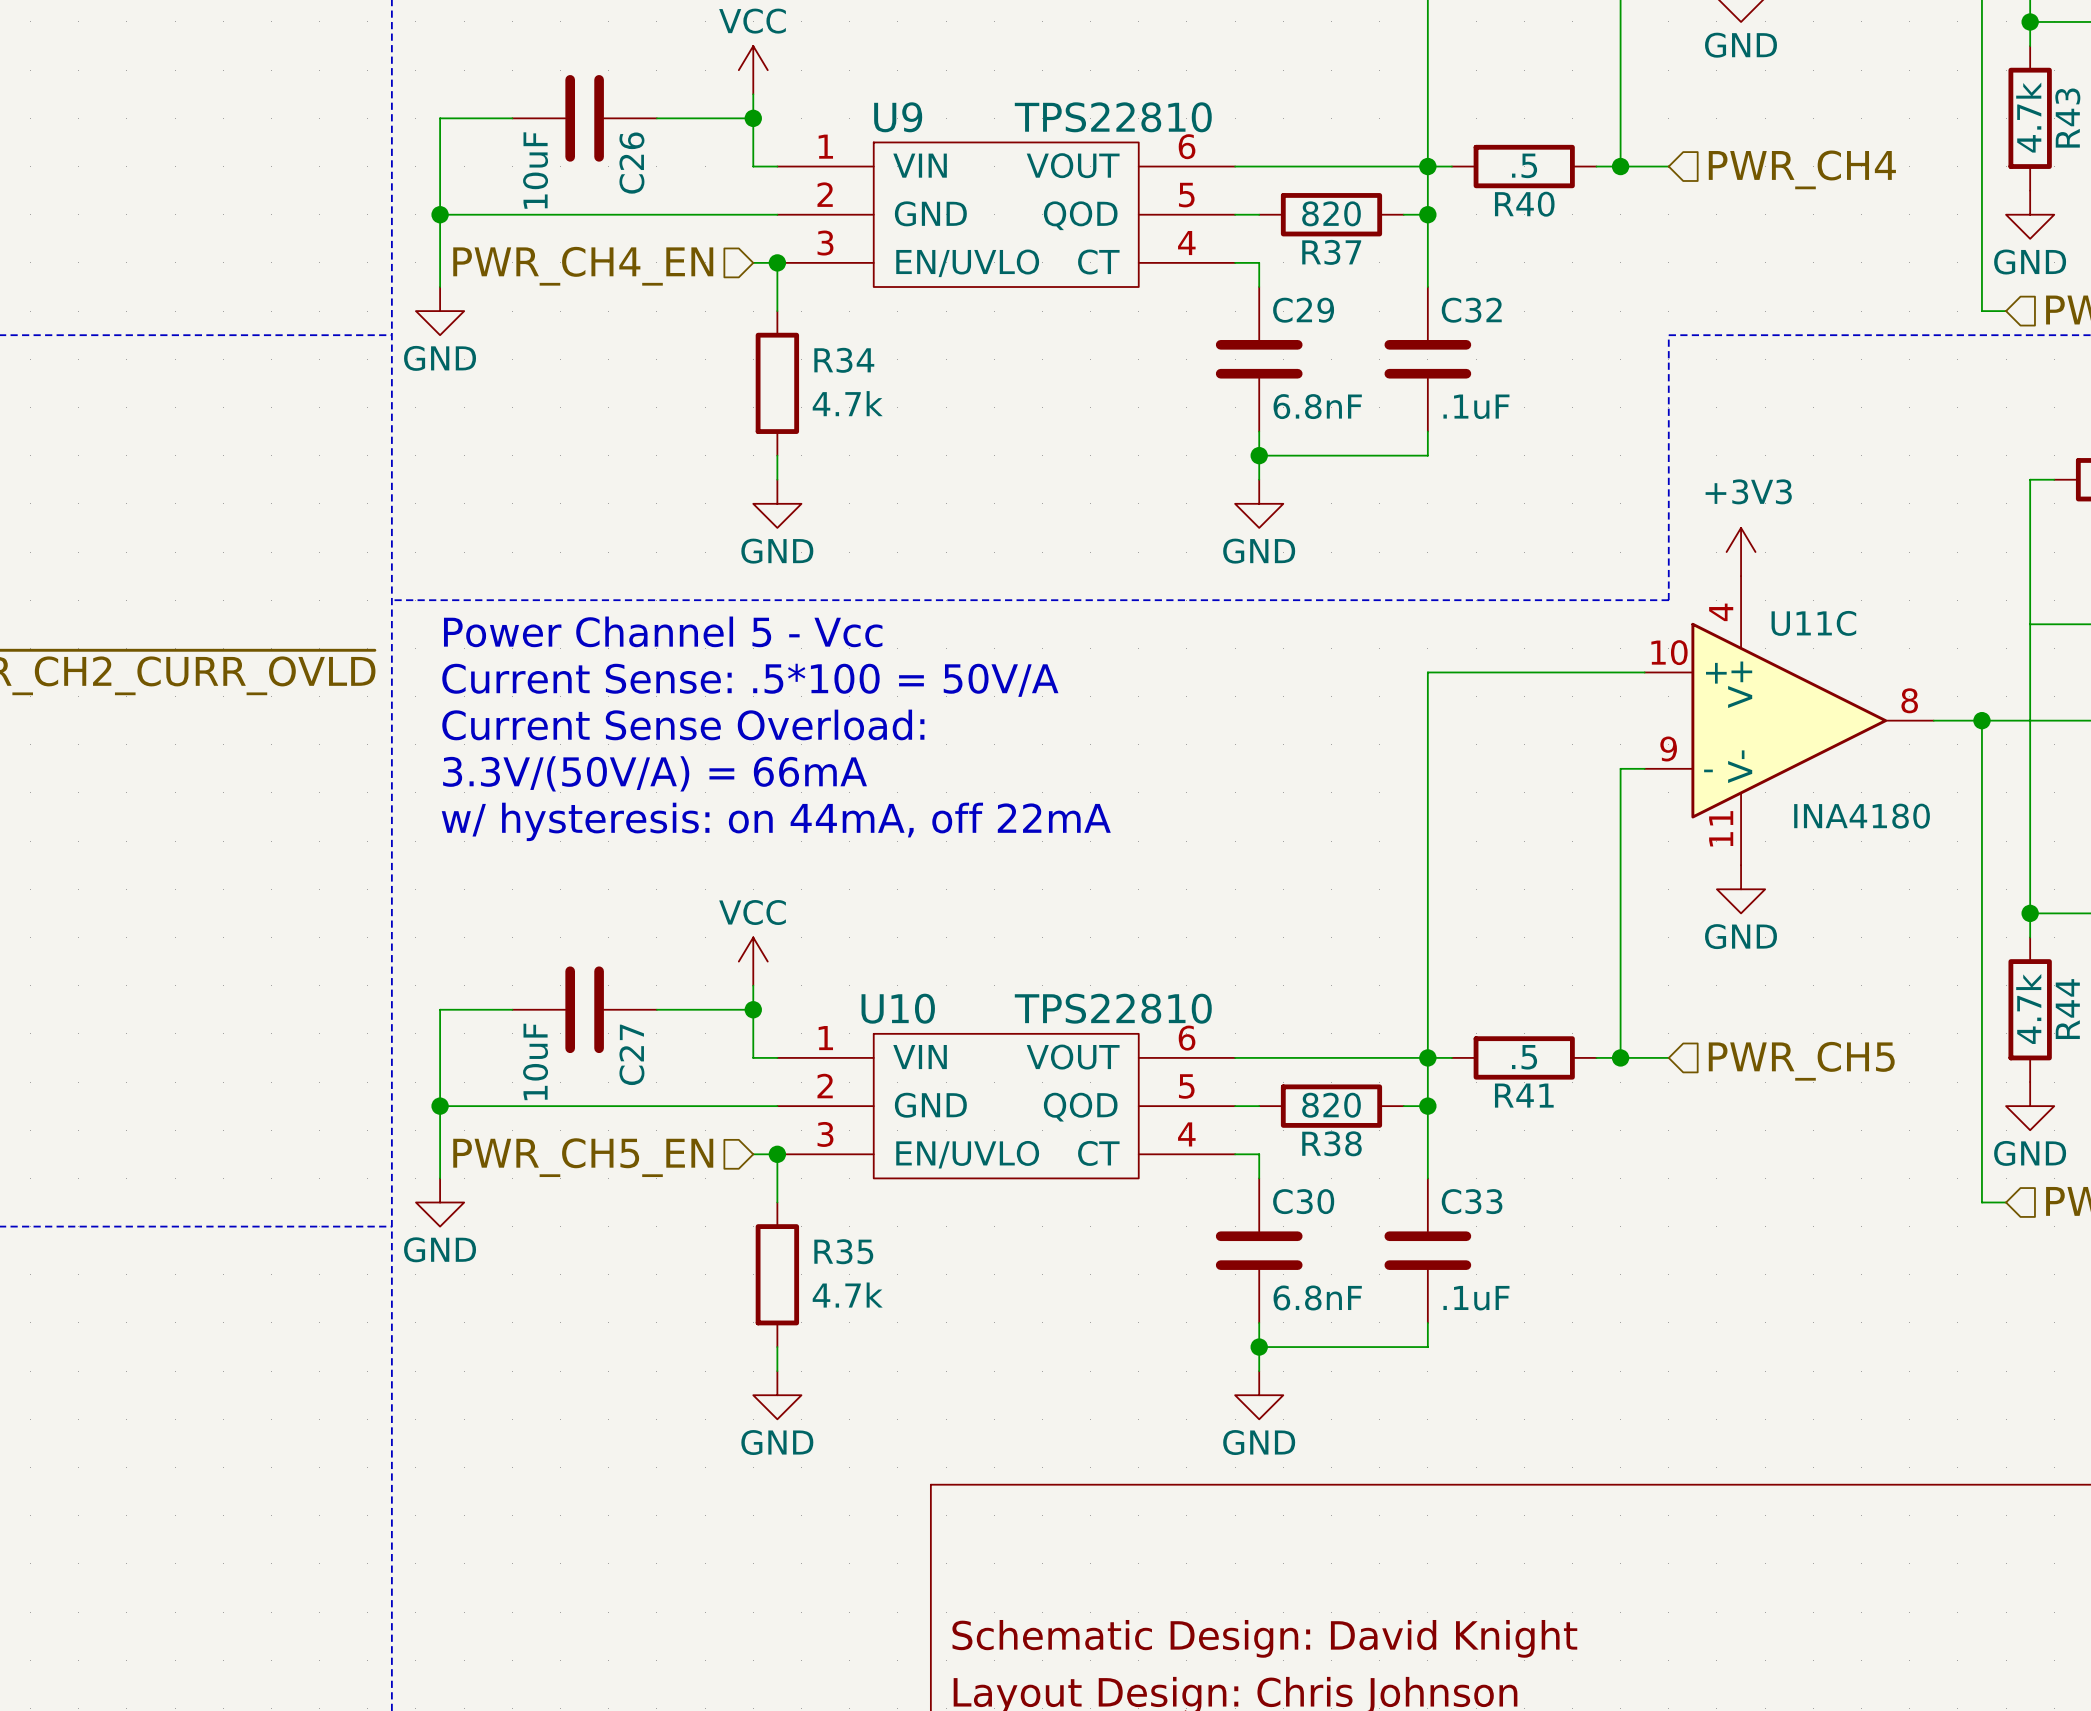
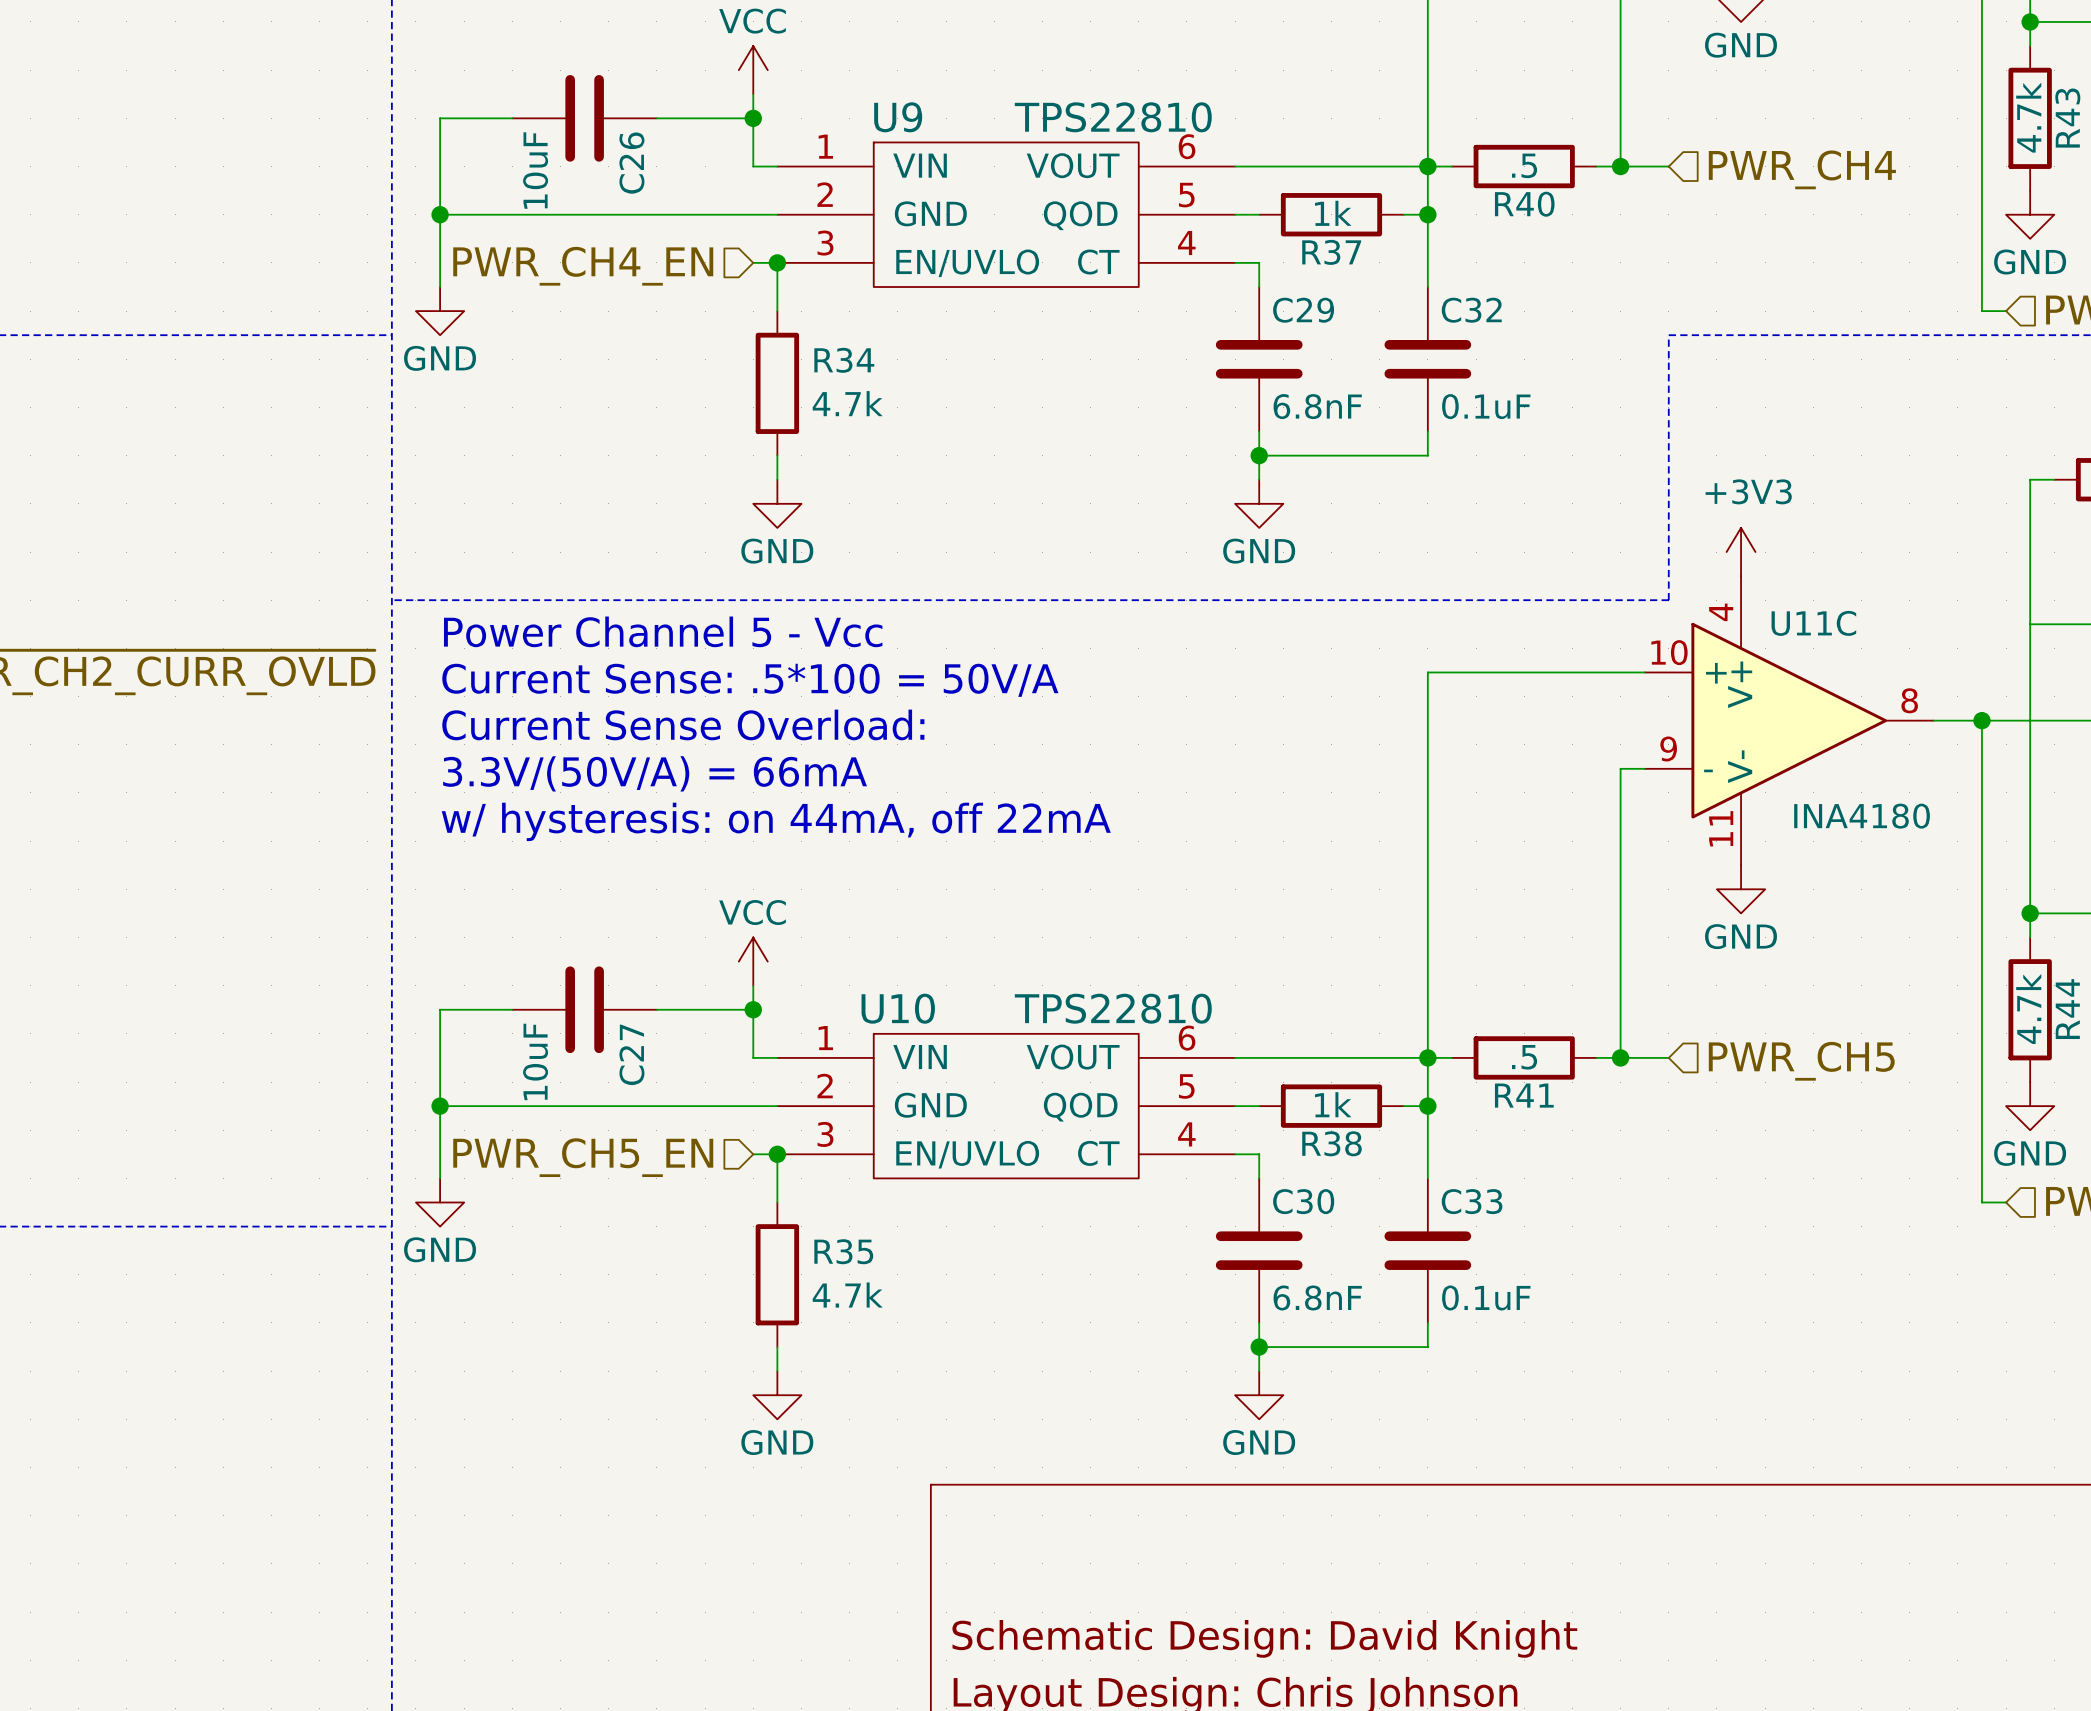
R37 value: 820 (1331, 213) -> 1k (1333, 213)
C32 value: .1uF (1476, 406) -> 0.1uF (1486, 406)
R38 value: 820 (1331, 1105) -> 1k (1333, 1104)
C33 value: .1uF (1476, 1298) -> 0.1uF (1486, 1297)

